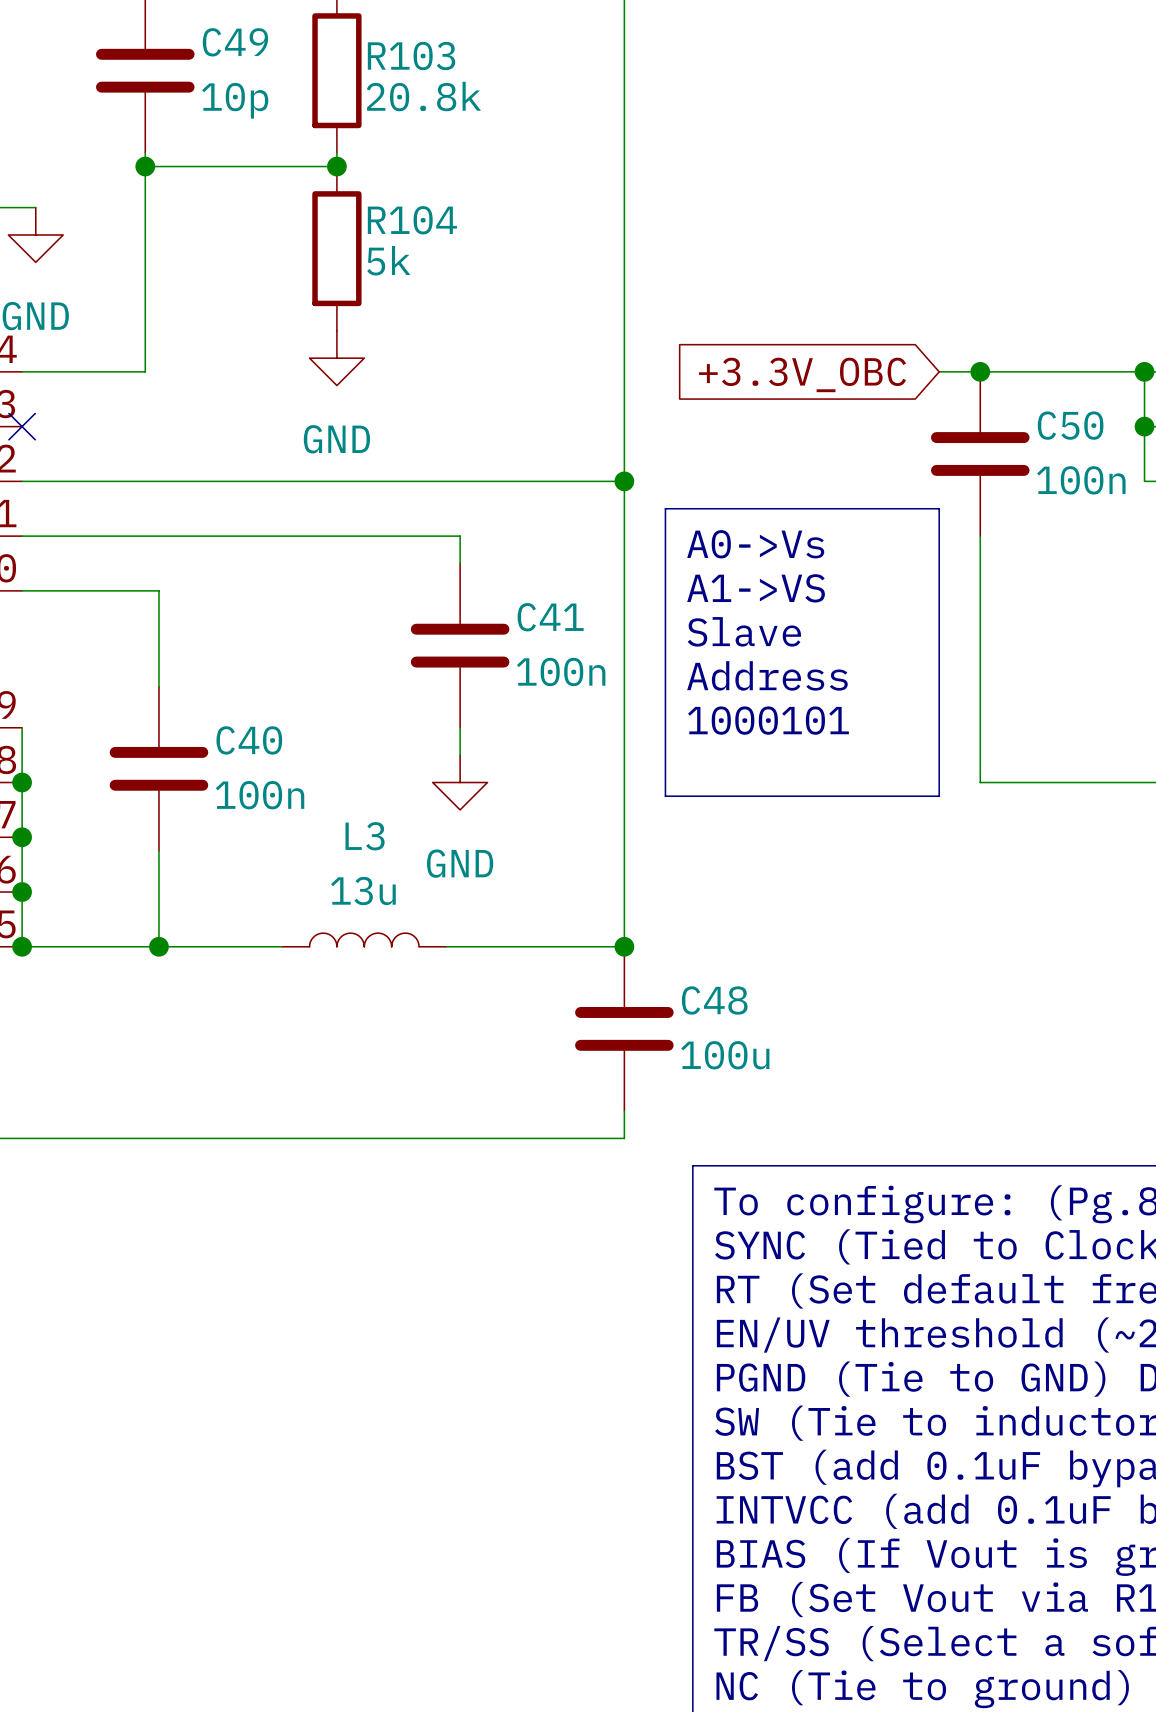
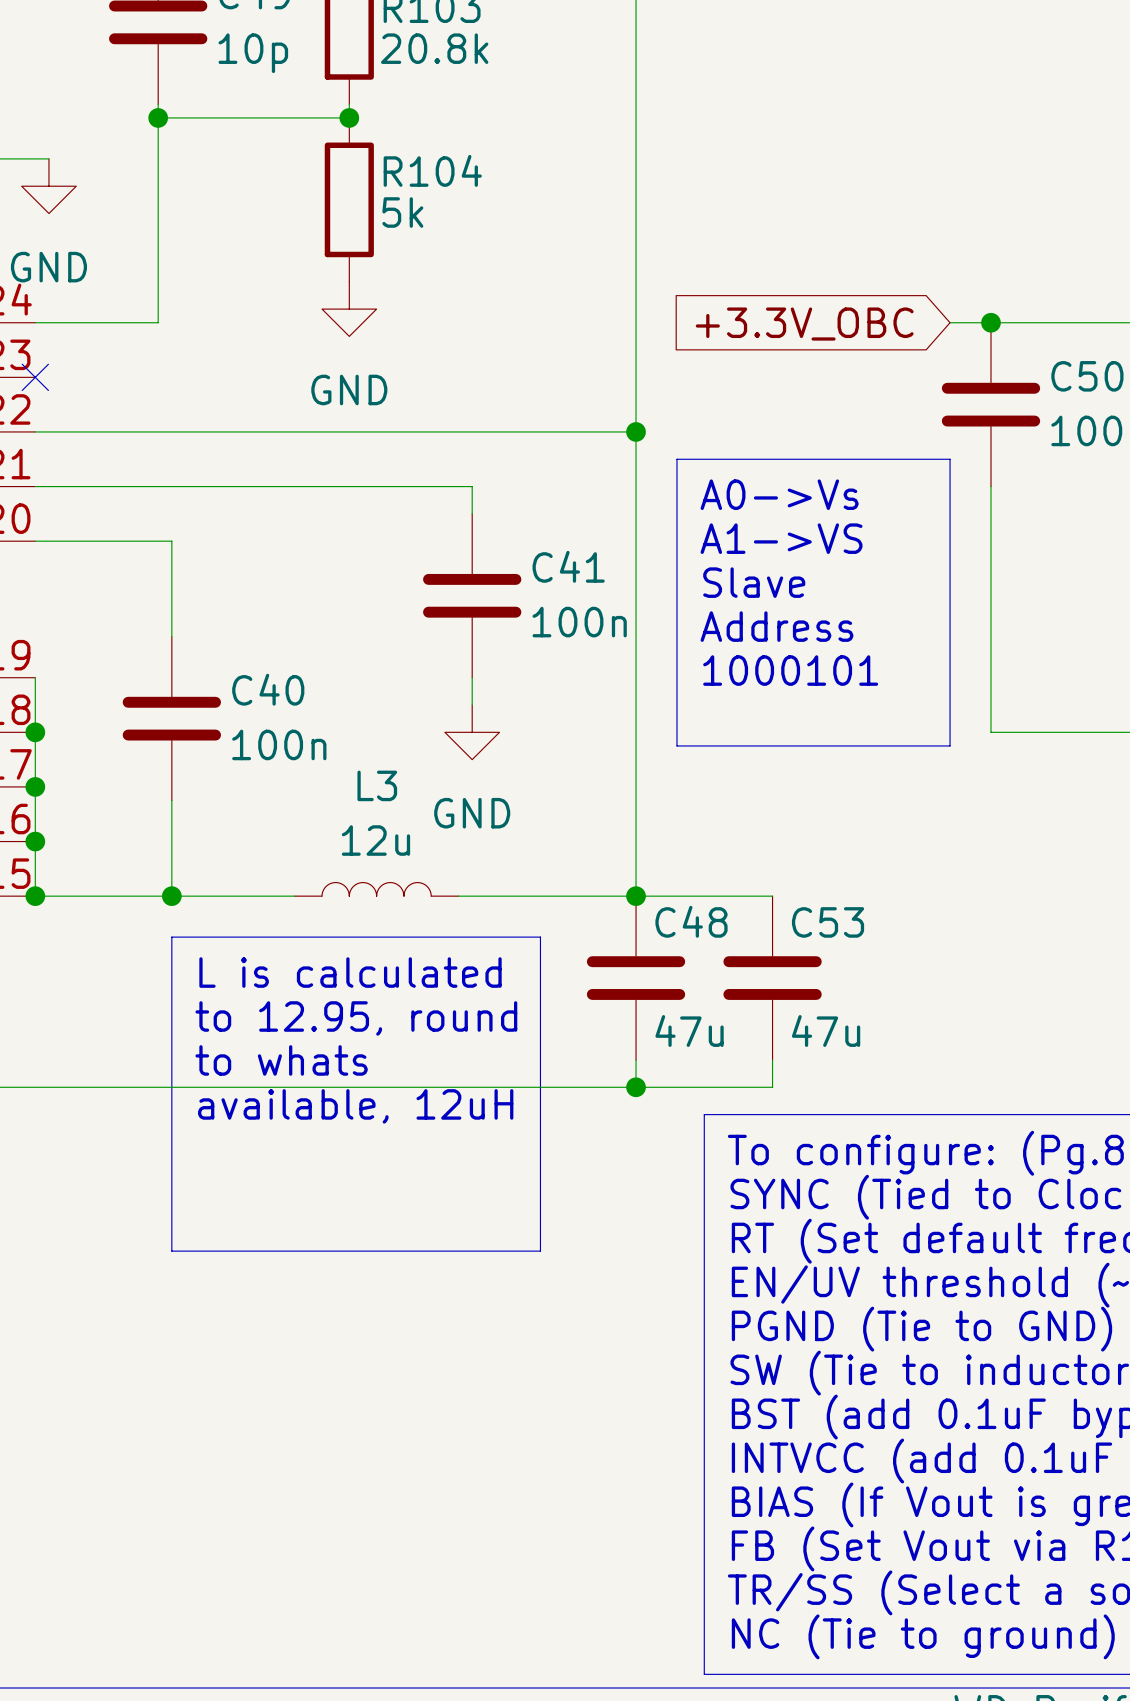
L3 value: 13u (363, 891) -> 12u (375, 840)
wire: none -> (636, 896) (772, 896)
line: none -> (171, 937) (540, 937) (540, 1251) (171, 1251) (171, 937)
C48 name position: C48 (714, 1000) -> C48 (691, 921)
text: none -> L is calculated (350, 972)
C53: none -> 47u (772, 978)
C48 value: 100u (725, 1055) -> 47u (689, 1031)
text: none -> to 12.95, round (356, 1018)
text: none -> to whats (281, 1060)
wire: none -> (772, 1059) (772, 1087) (636, 1087)
junction: none -> (636, 1087)
text: none -> available, 12uH (355, 1106)

